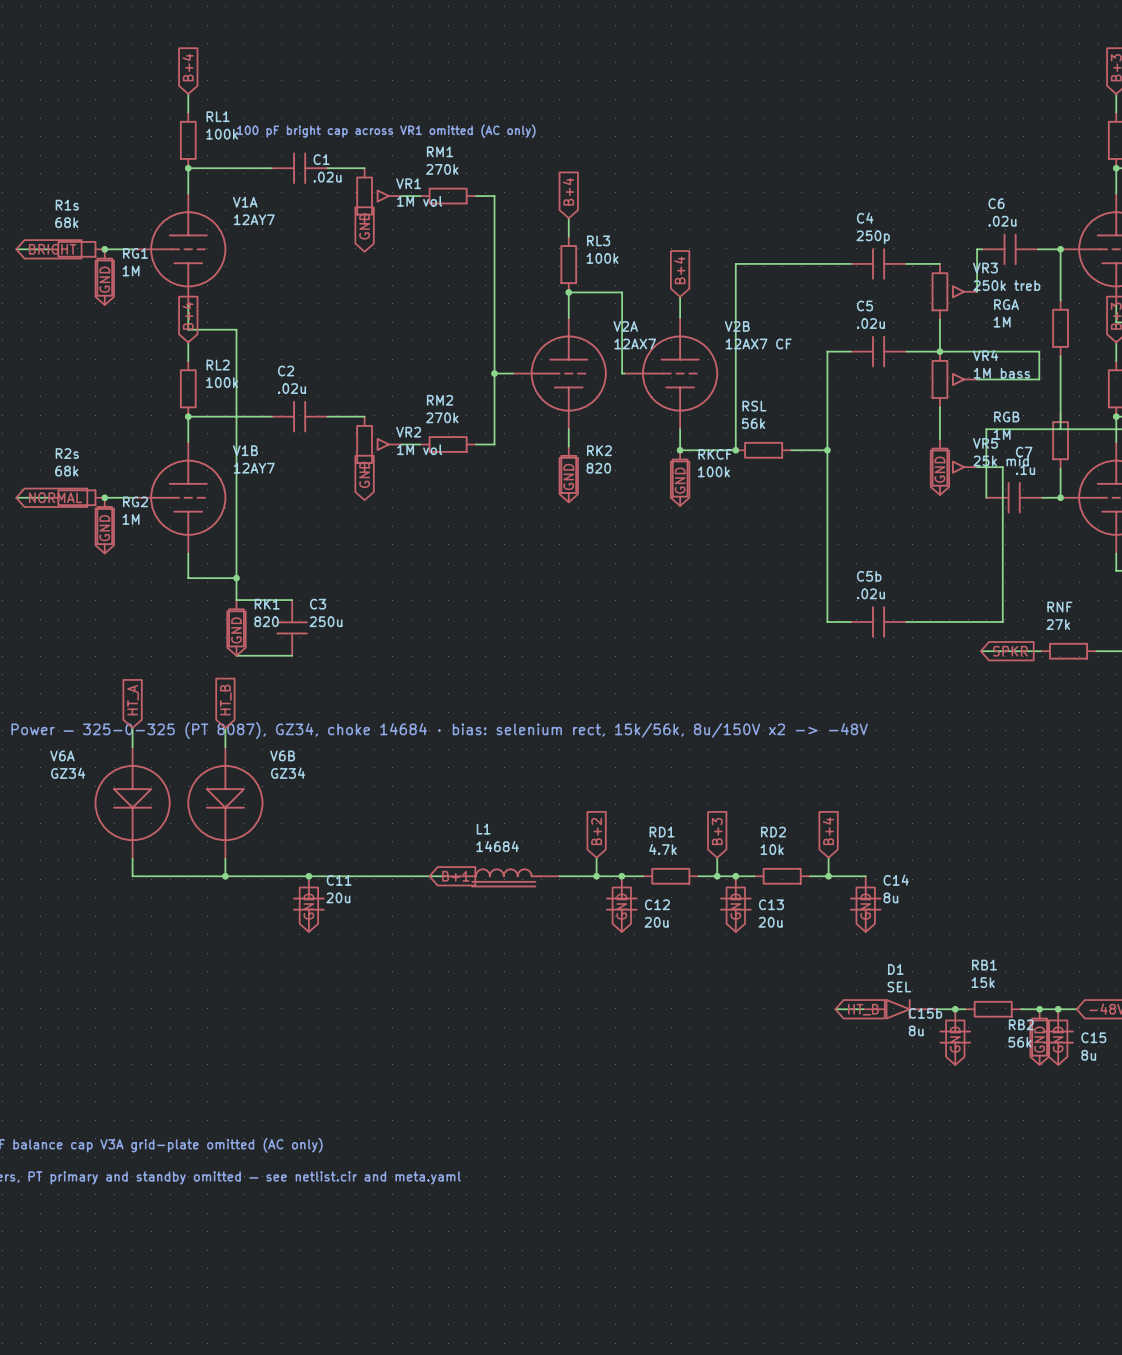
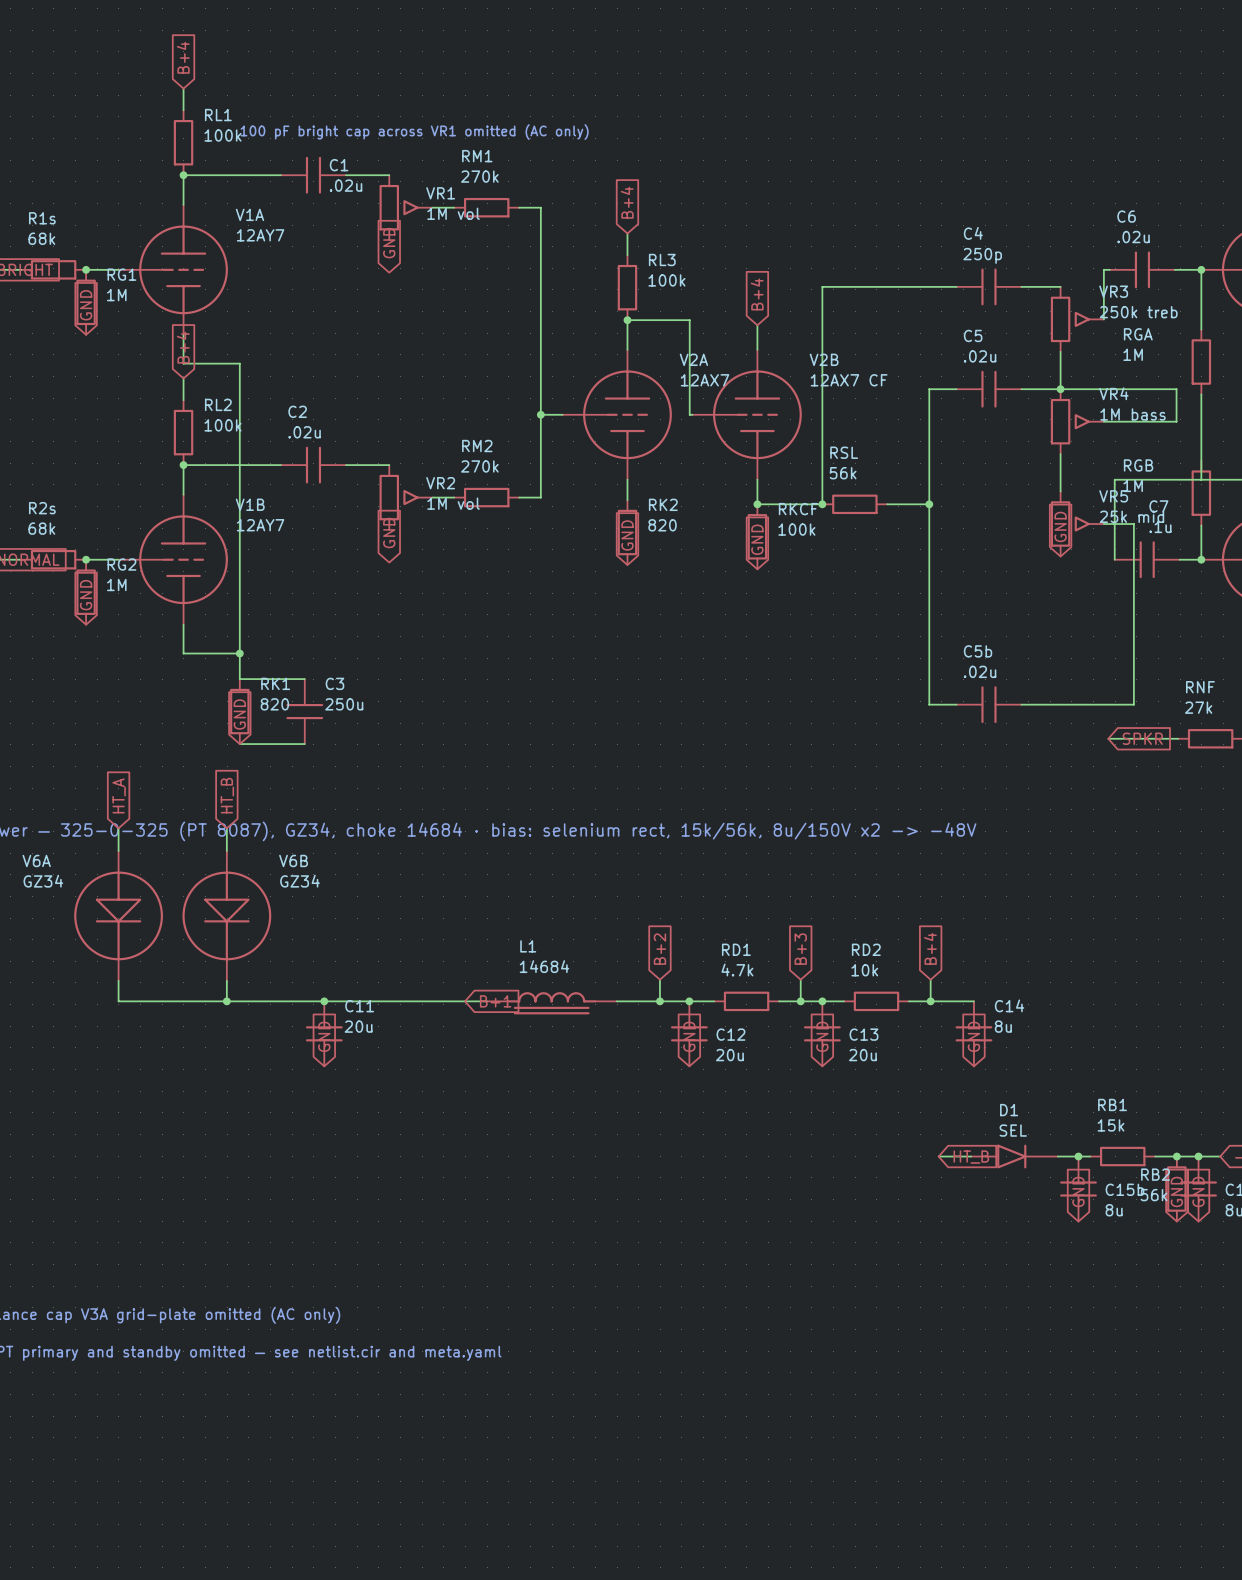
C15b name position: C15b (925, 1013) -> C15b (1124, 1189)
C15b value position: 8u (916, 1030) -> 8u (1114, 1210)

